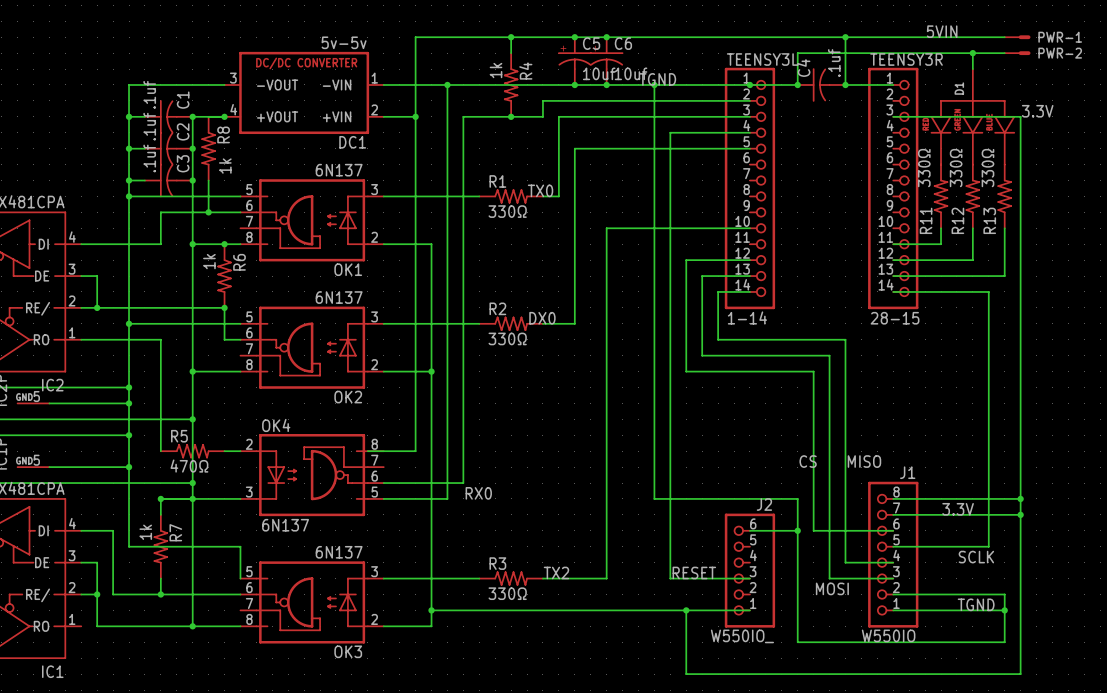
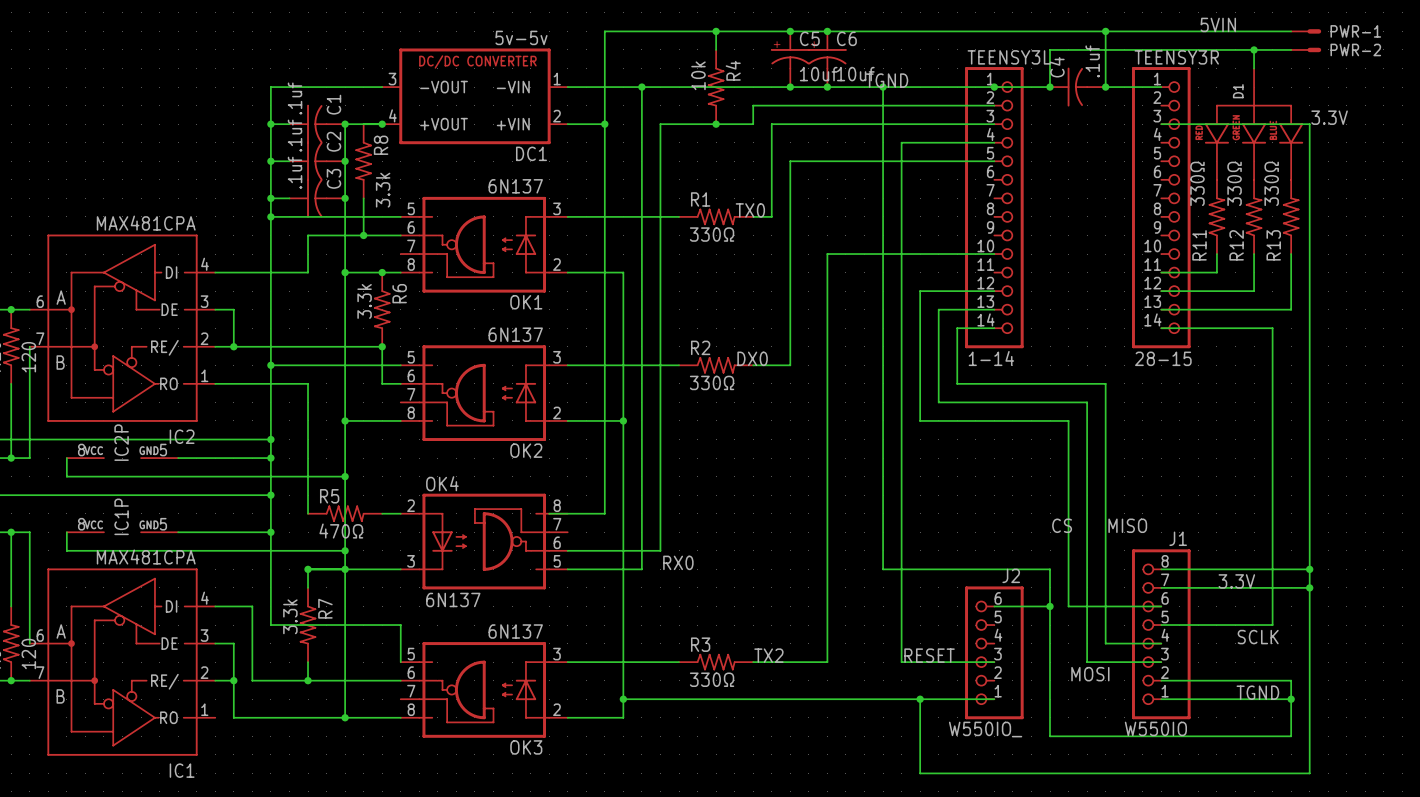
R4 value: 1k (496, 70) -> 10k (698, 75)
R8 value: 1k (225, 166) -> 3.3k (383, 190)
R6 value: 1k (209, 261) -> 3.3k (364, 301)
R7 value: 1k (145, 532) -> 3.3k (290, 616)

